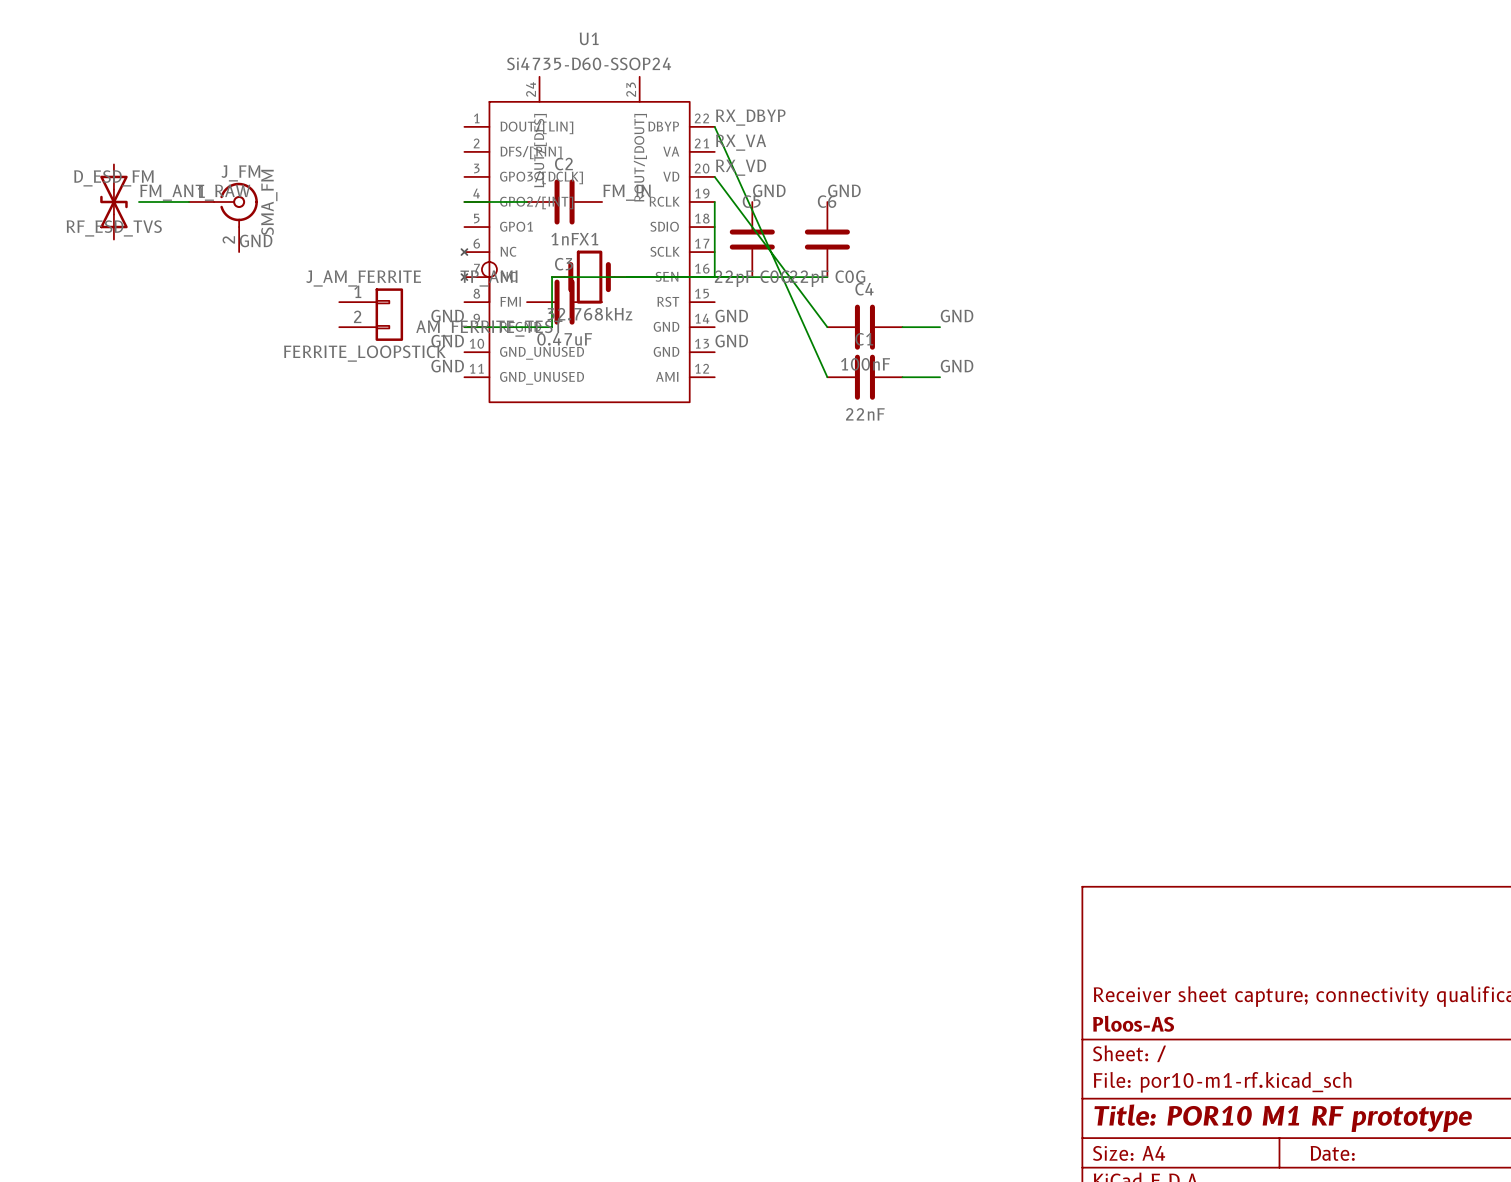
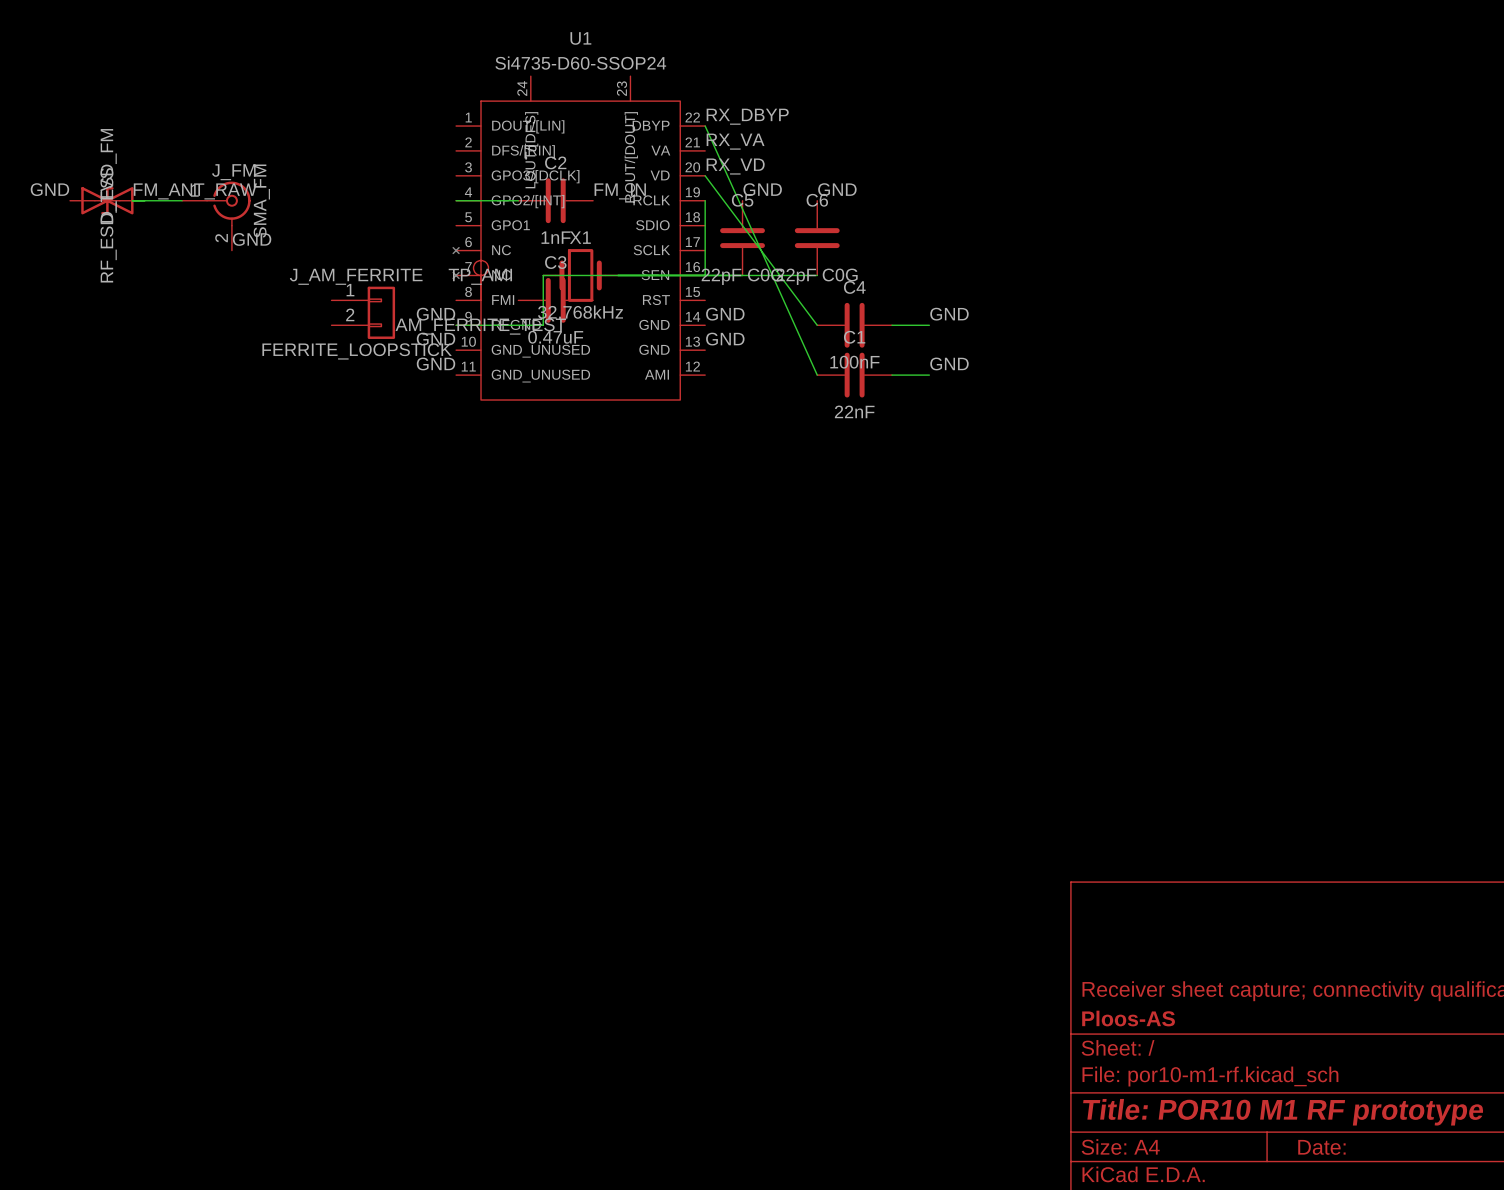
label: none -> GND (49, 189)
D_ESD_FM rotation: 0° (113, 201) -> 90° clockwise (107, 200)

